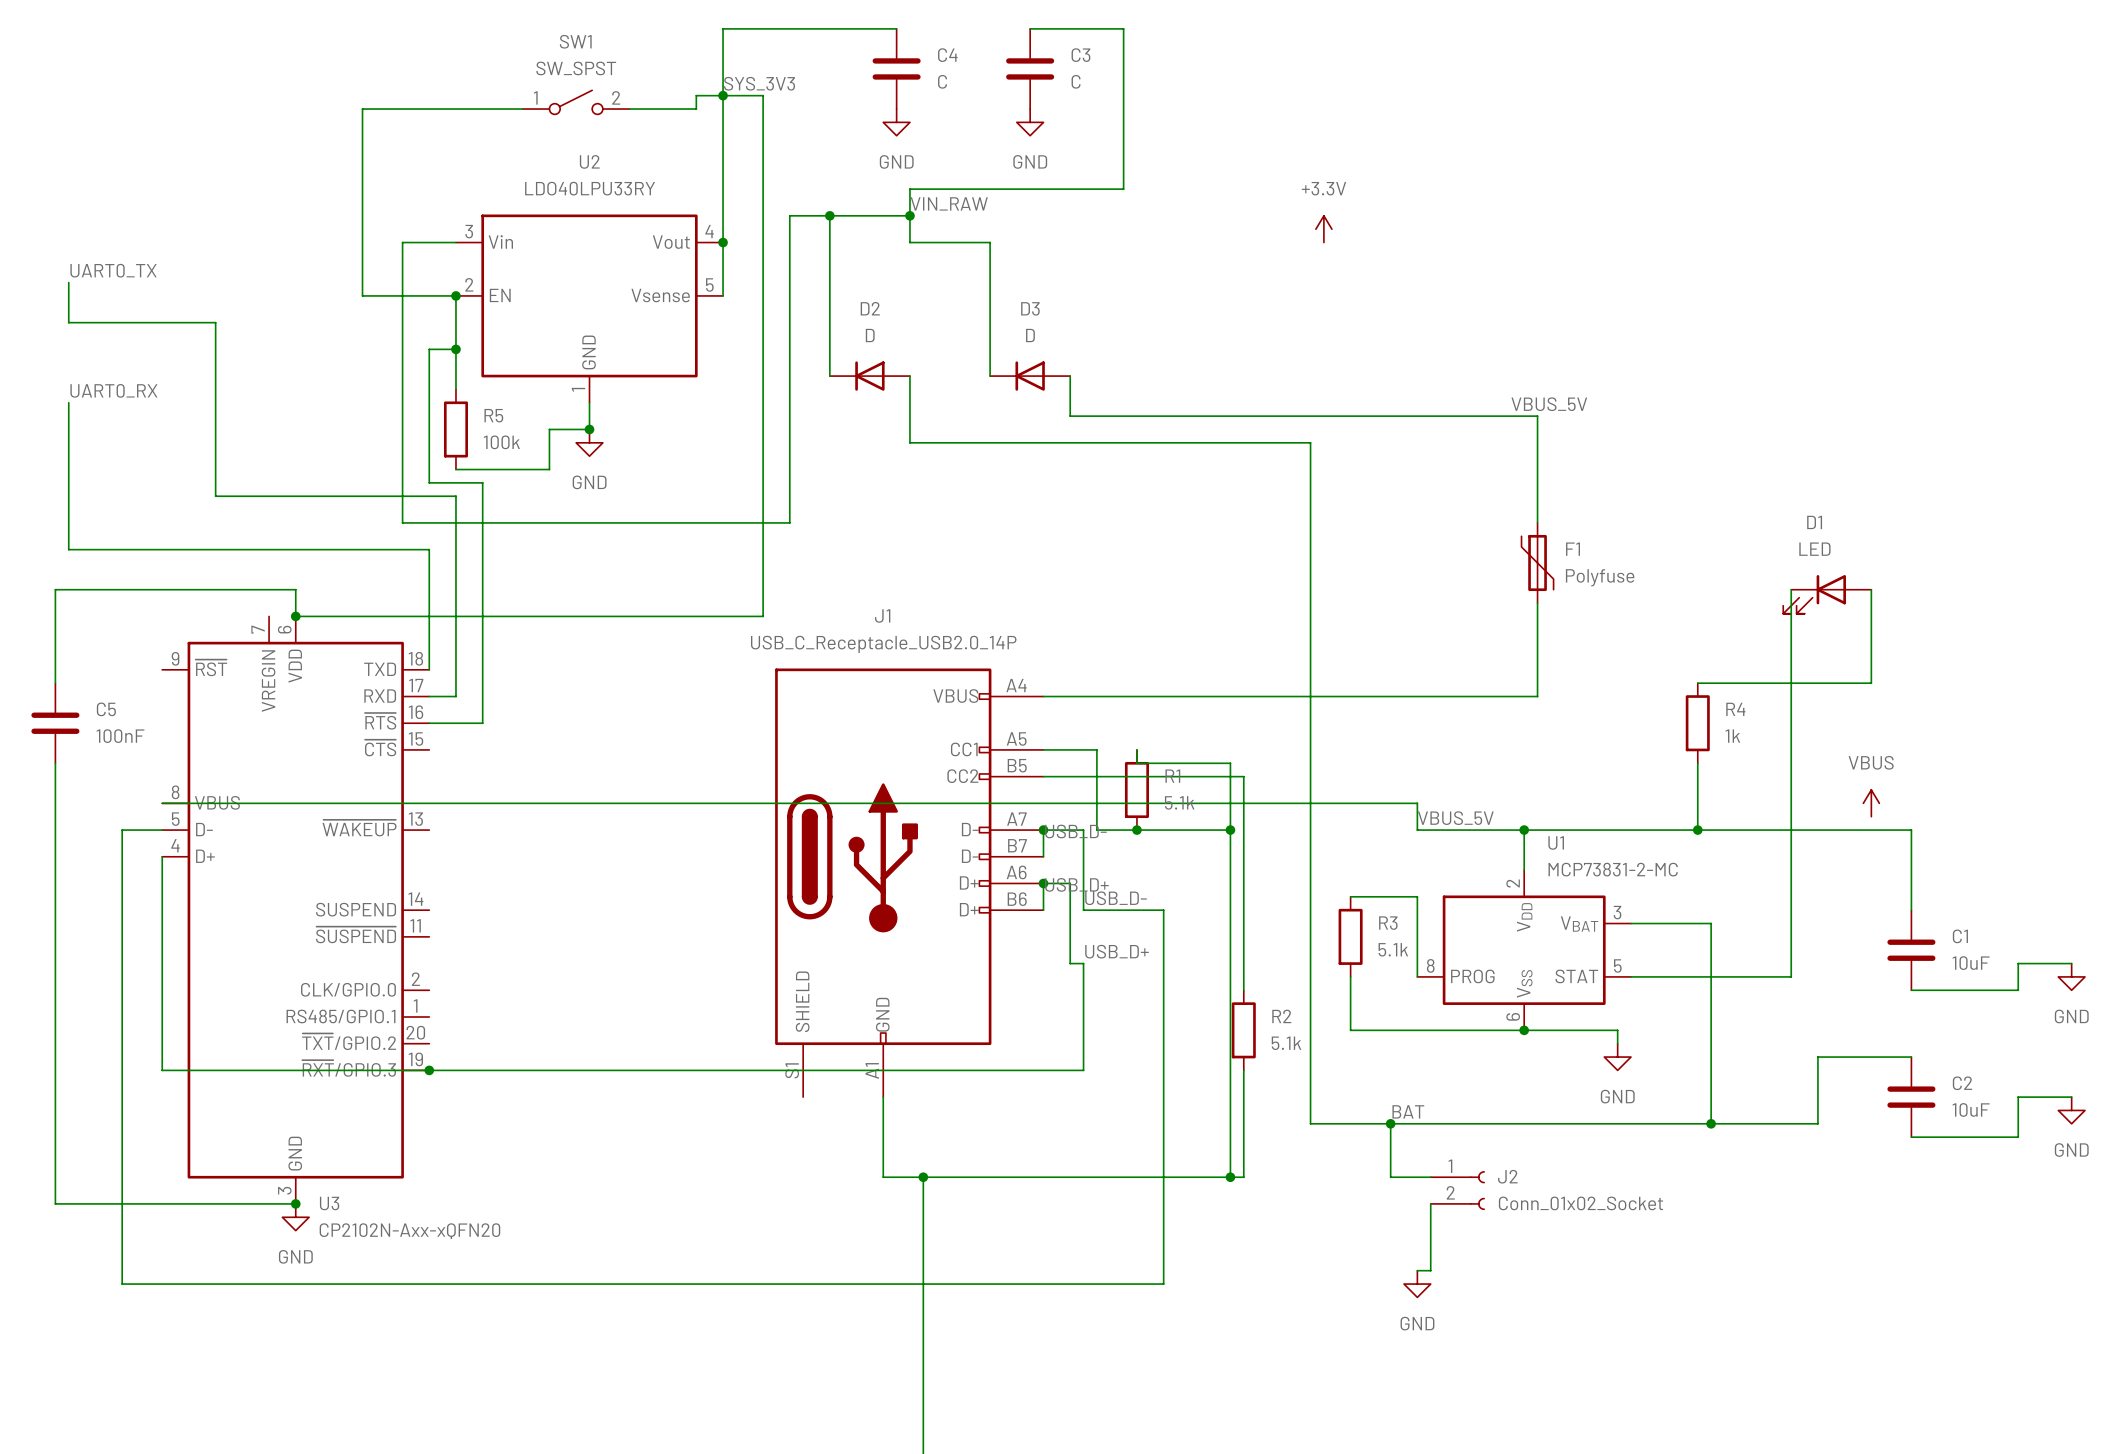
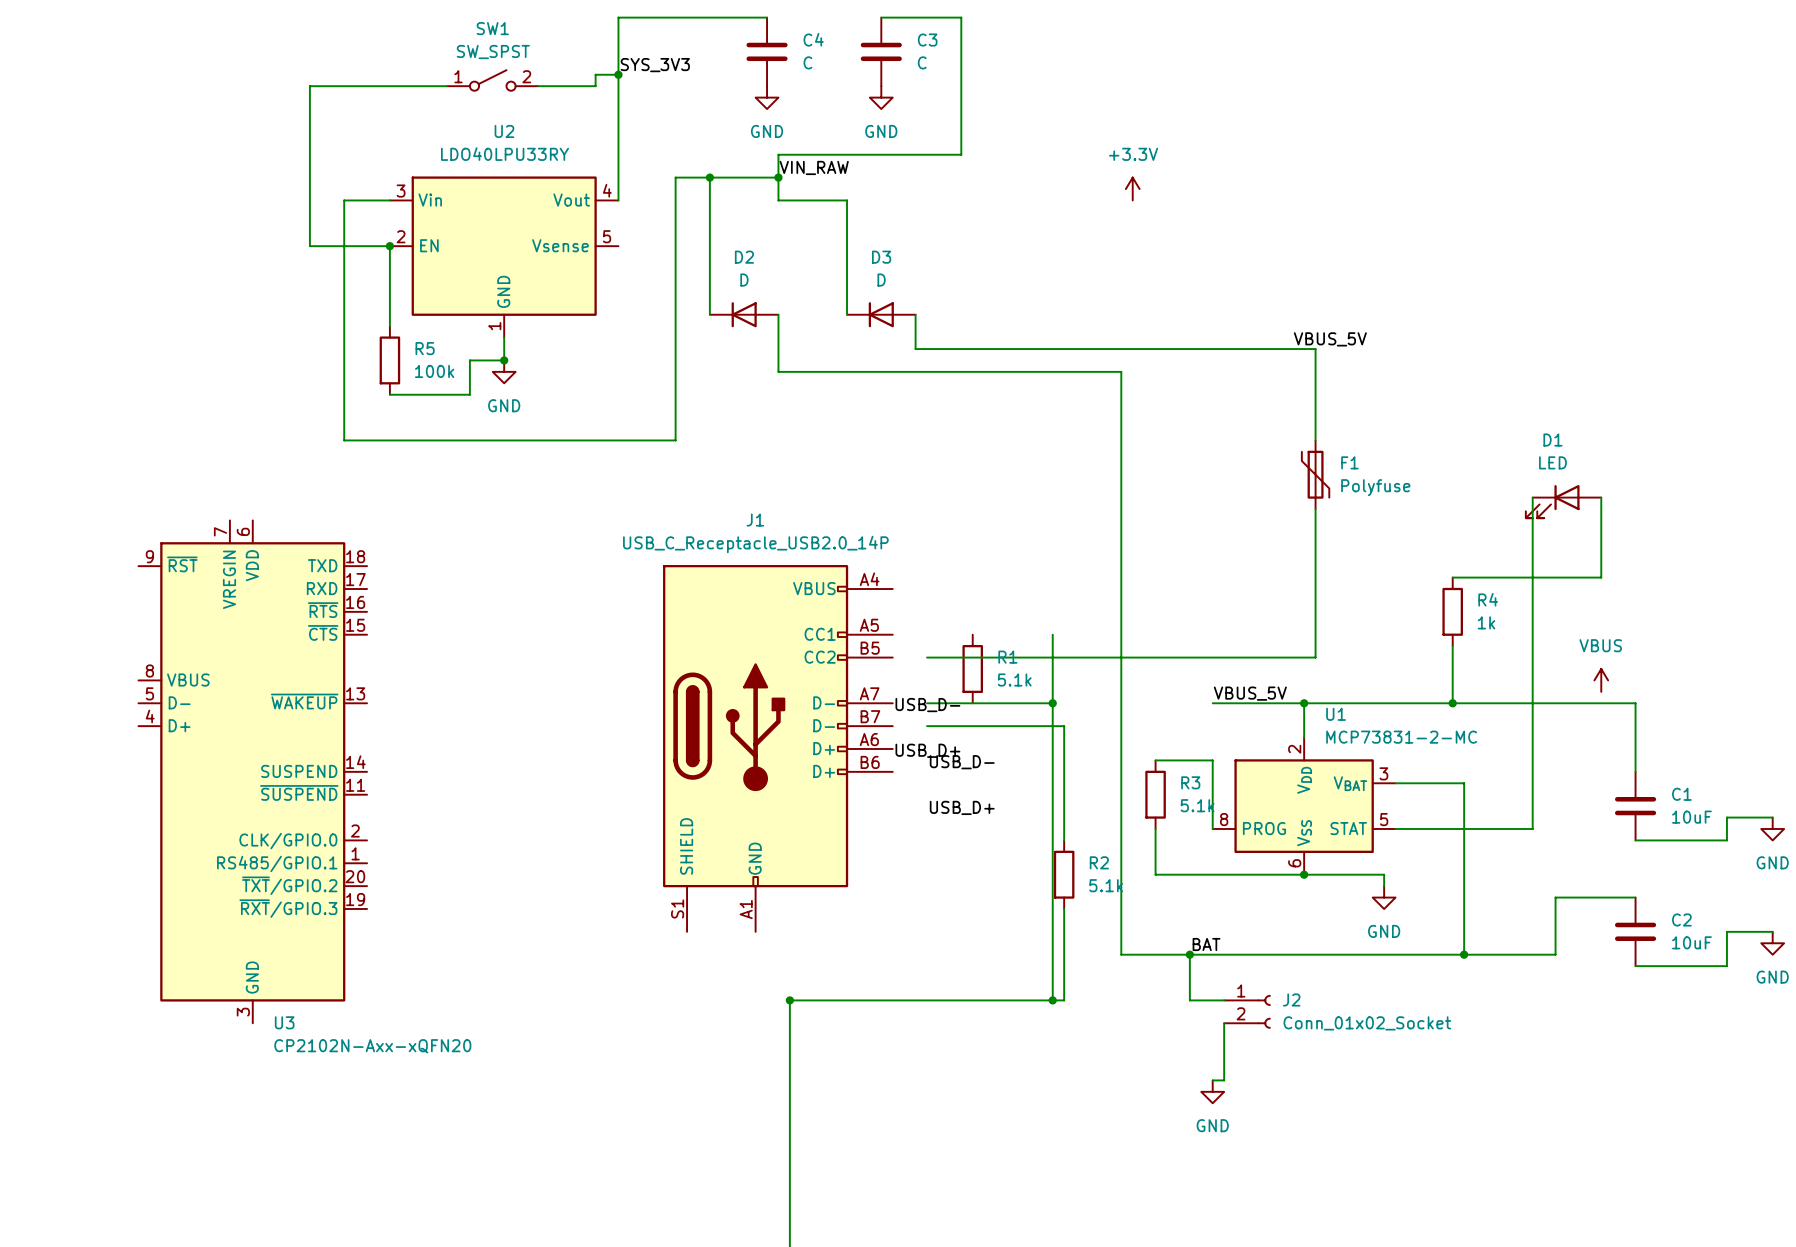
wire: (723, 95) (763, 95) (763, 616) (295, 616) (295, 589) (55, 589) (55, 683) -> none
wire: (723, 242) (723, 295) -> none
junction: (723, 242) -> none
label: UART0_TX (113, 270) -> none
wire: (68, 282) (68, 322) (215, 322) (215, 496) (455, 496) (455, 696) (429, 696) -> none
wire: (455, 349) (429, 349) (429, 482) (482, 482) (482, 723) (429, 723) -> none
junction: (455, 349) -> none
label: UART0_RX (113, 390) -> none
wire: (68, 402) (68, 549) (429, 549) (429, 669) -> none
junction: (295, 616) -> none
wire: (1043, 696) (1537, 696) -> (1064, 657) (1315, 657) (1315, 589)
C5: 100nF (55, 723) -> none
wire: (1043, 749) (1096, 749) (1096, 830) -> (927, 703) (938, 703)
wire: (1136, 749) (1136, 763) (1230, 763) -> (1052, 634) (1052, 646)
wire: (55, 763) (55, 1203) (295, 1203) -> none
wire: (1043, 776) (1083, 776) -> none
wire: (1243, 776) (1243, 856) -> (927, 726) (1064, 726)
wire: (162, 803) (1417, 803) (1417, 830) -> none
wire: (162, 830) (122, 830) (122, 1284) (1163, 1284) (1163, 910) (1083, 910) (1083, 830) (1043, 830) (1043, 856) -> none
junction: (1043, 830) -> none
junction: (1136, 830) -> none
wire: (162, 856) (162, 1070) (1083, 1070) (1083, 963) (1070, 963) (1070, 883) (1043, 883) (1043, 910) -> none
junction: (1043, 883) -> none
junction: (429, 1070) -> none
wire: (883, 1097) (883, 1177) (923, 1177) -> none
junction: (295, 1203) -> none
power symbol: GND (295, 1217) -> none

